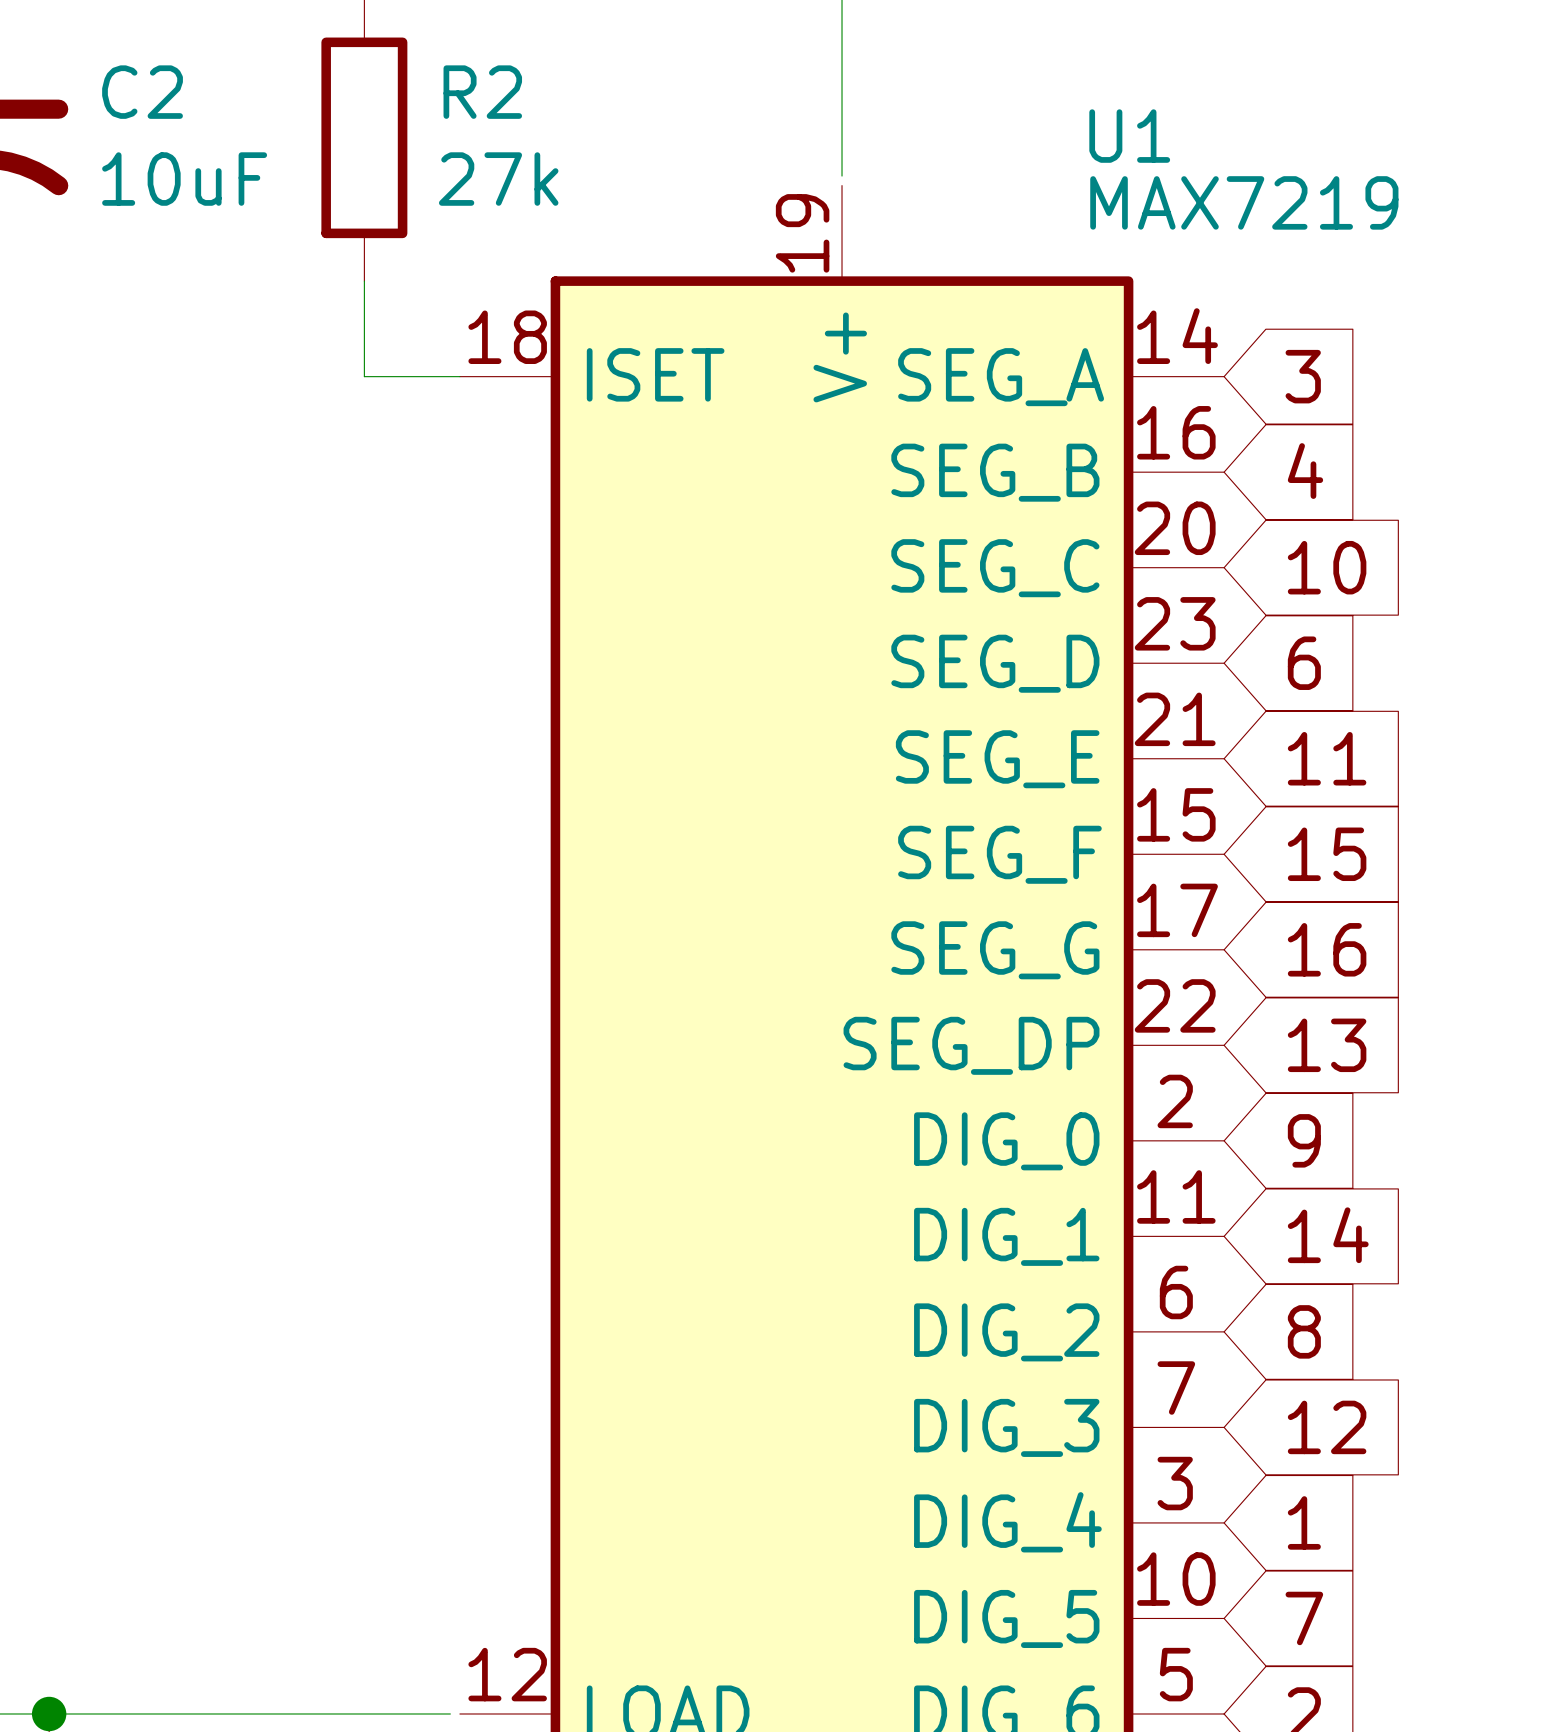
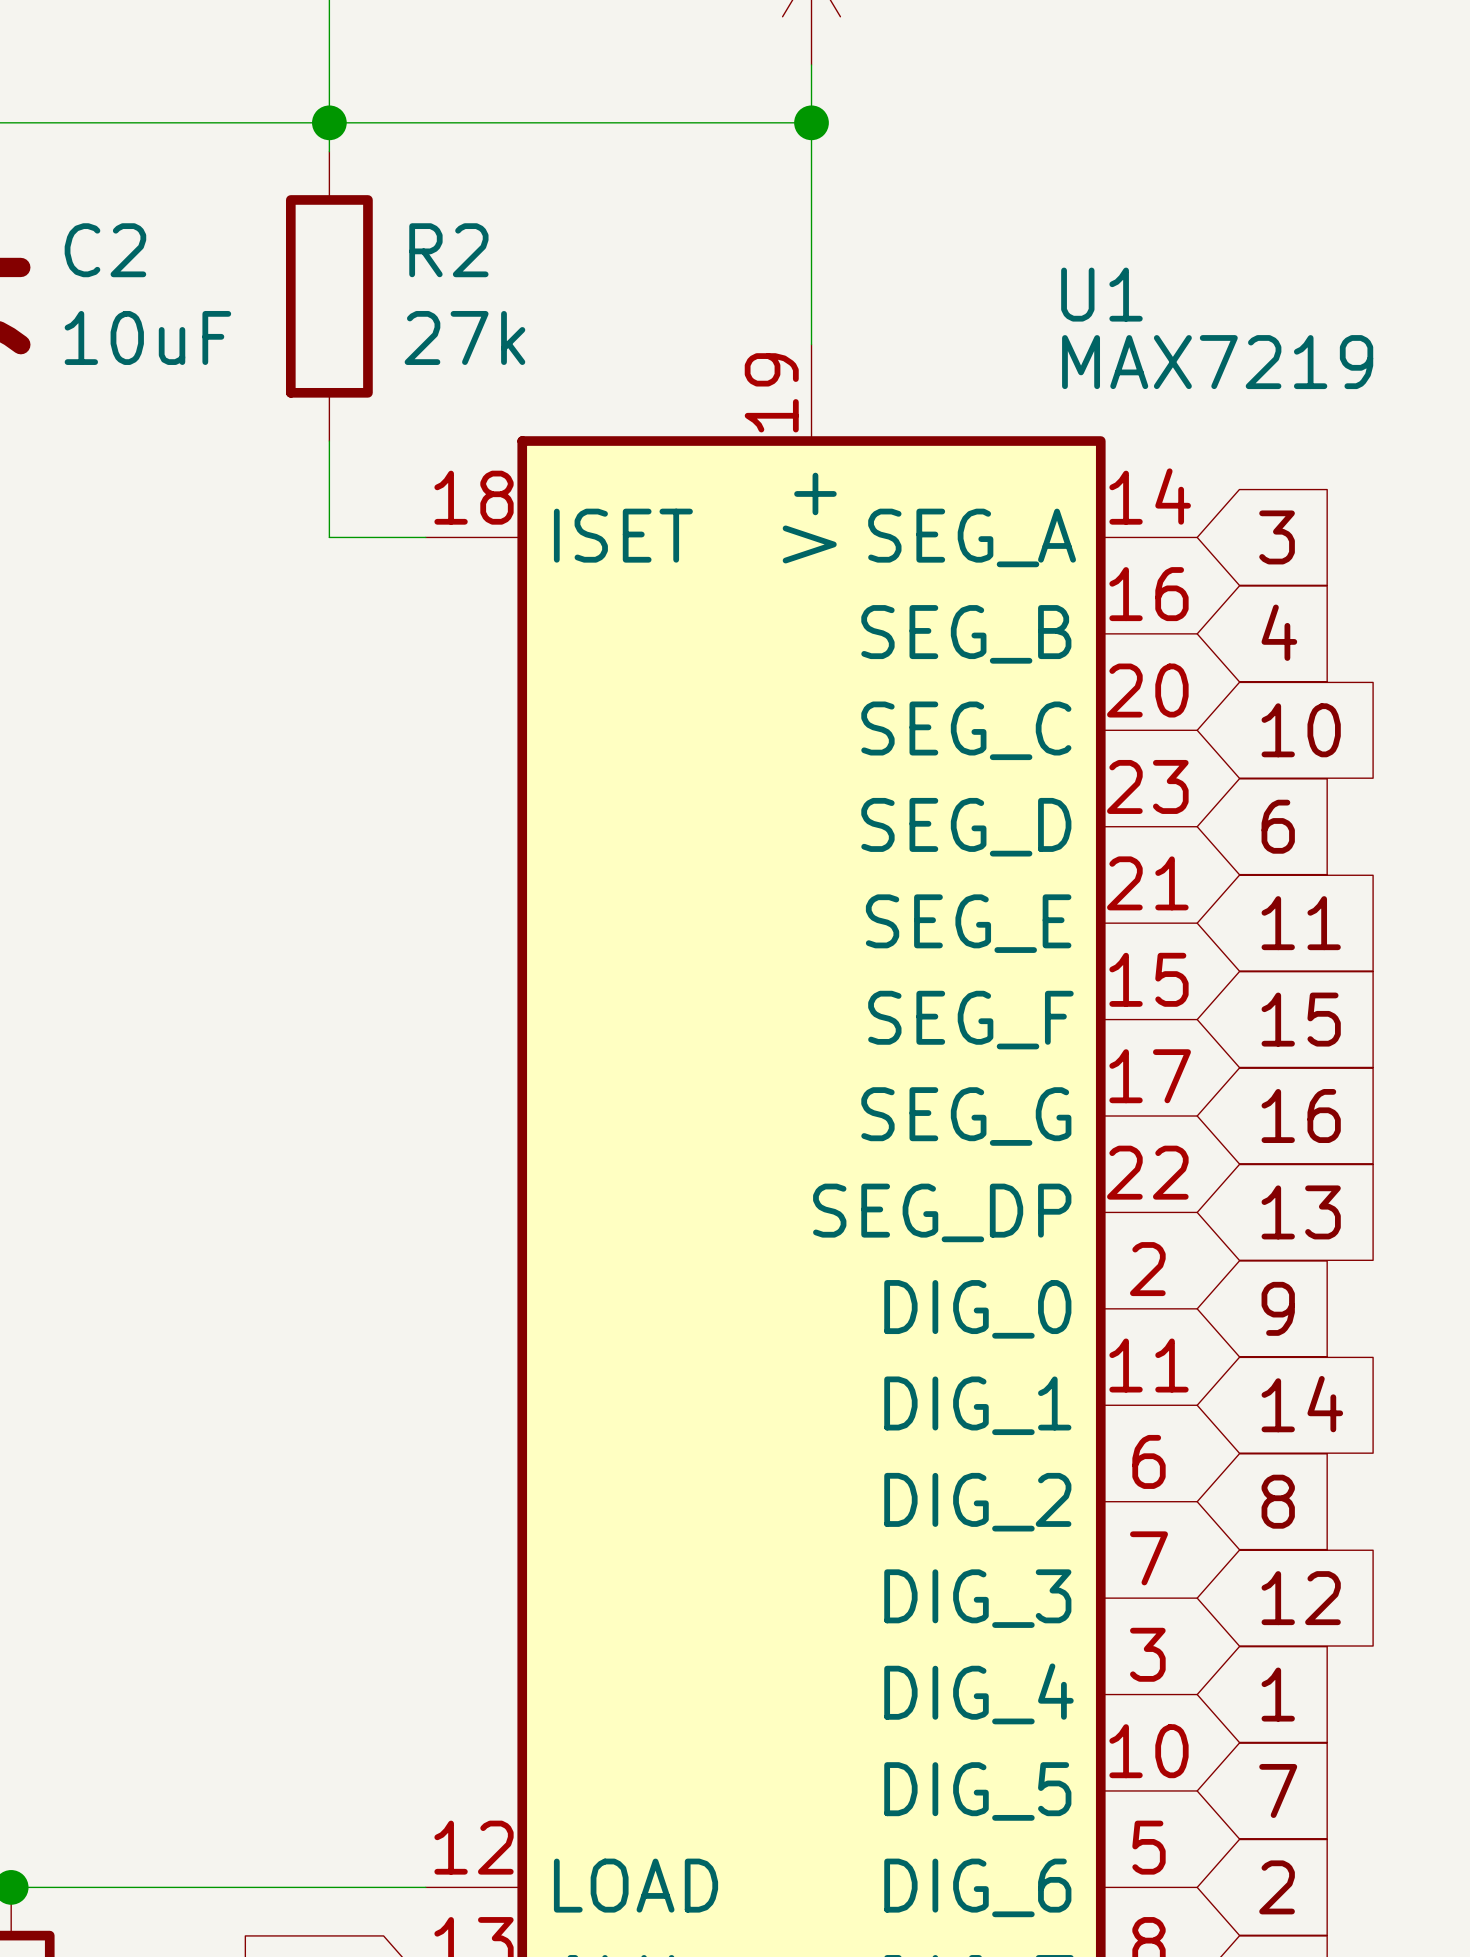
wire: none -> (811, 334) (811, 344)
wire: none -> (416, 1887) (425, 1887)

